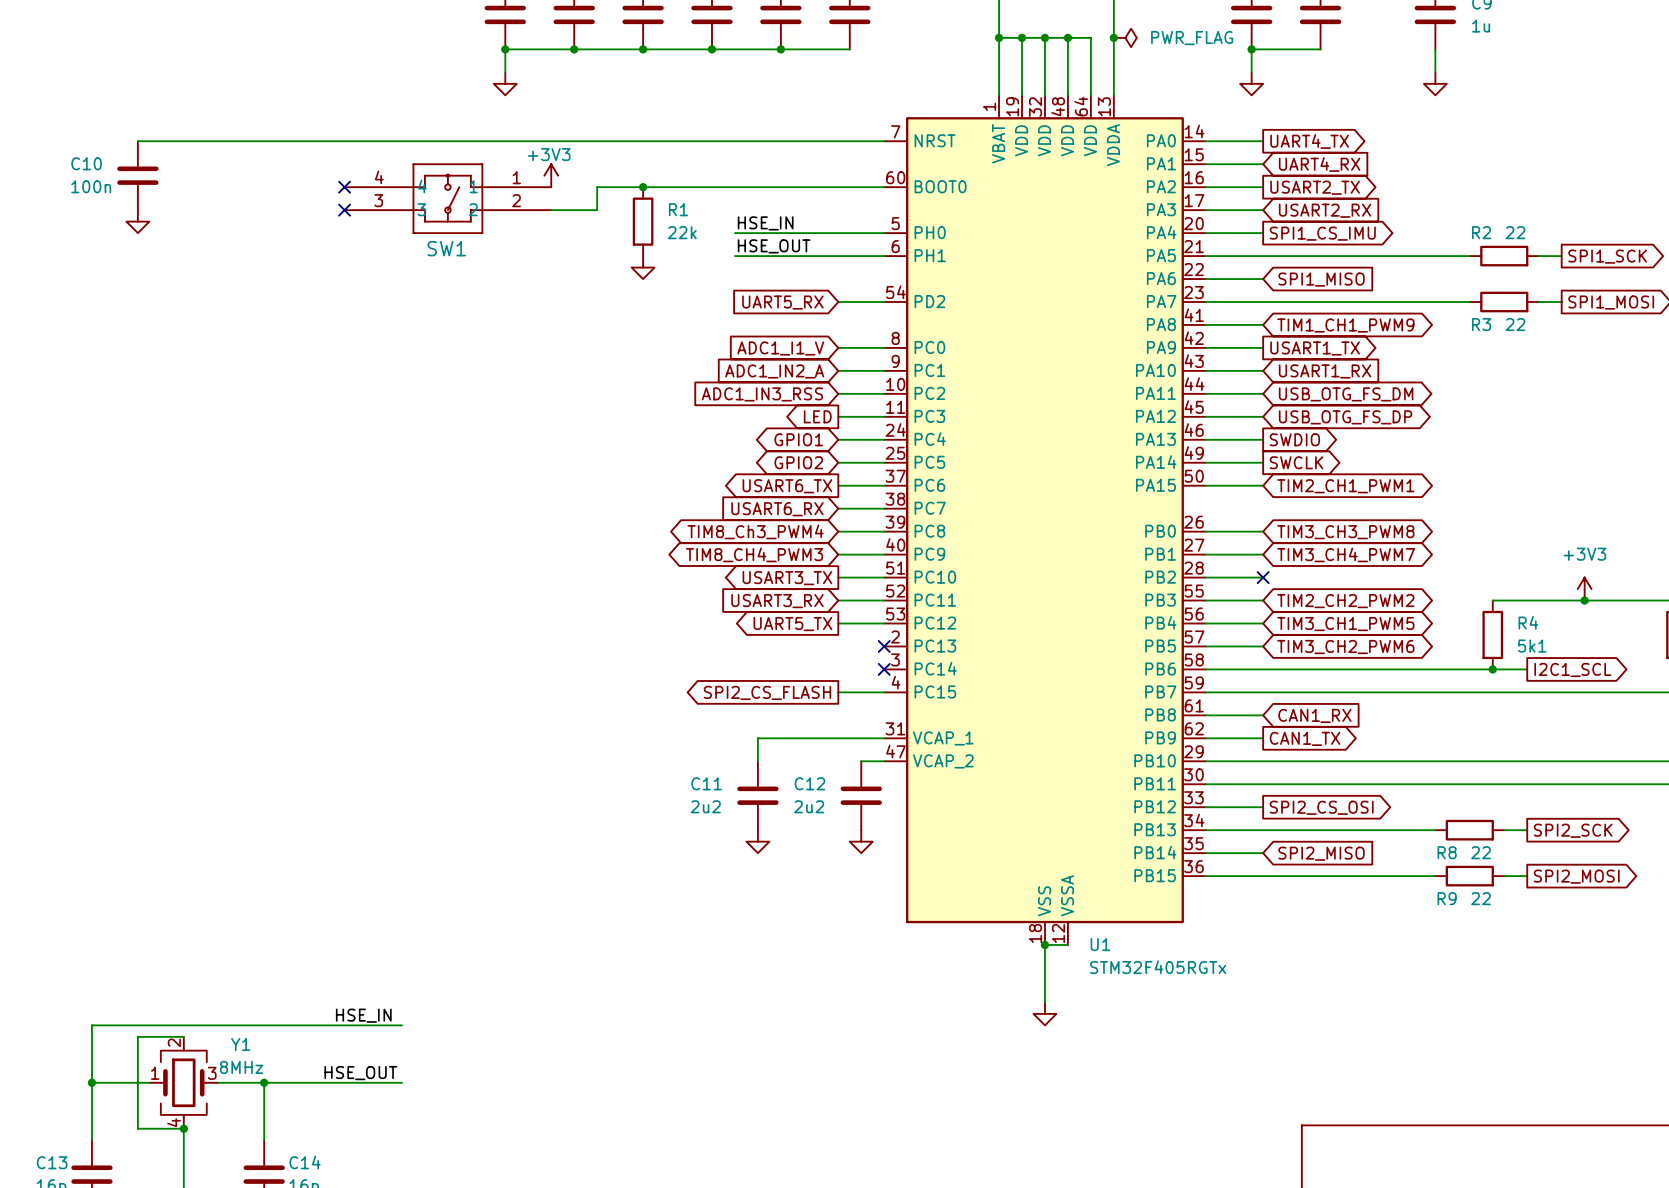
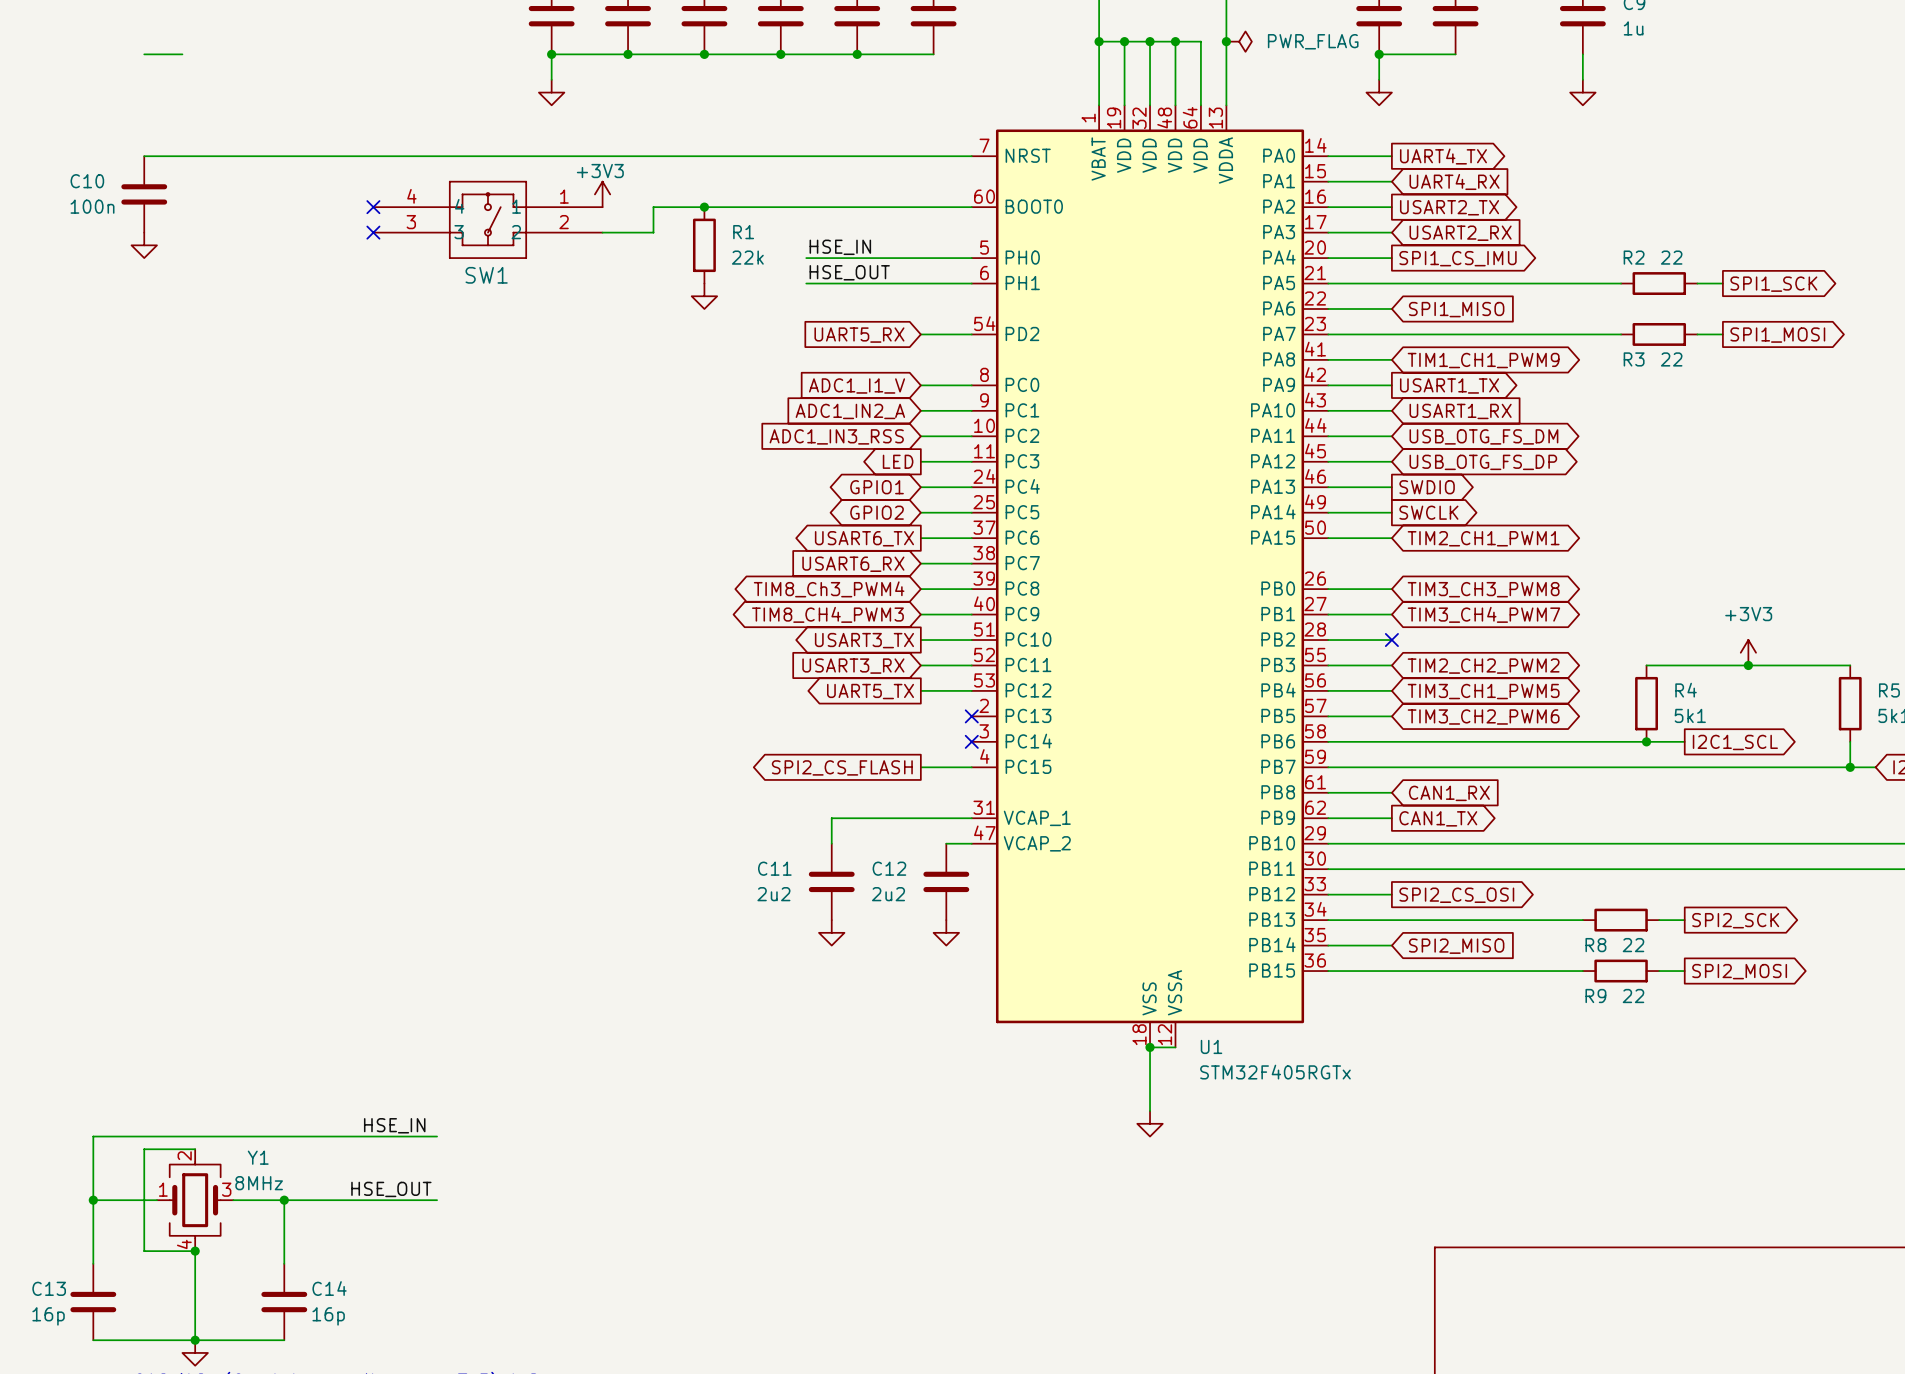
wire: none -> (144, 54) (182, 54)

